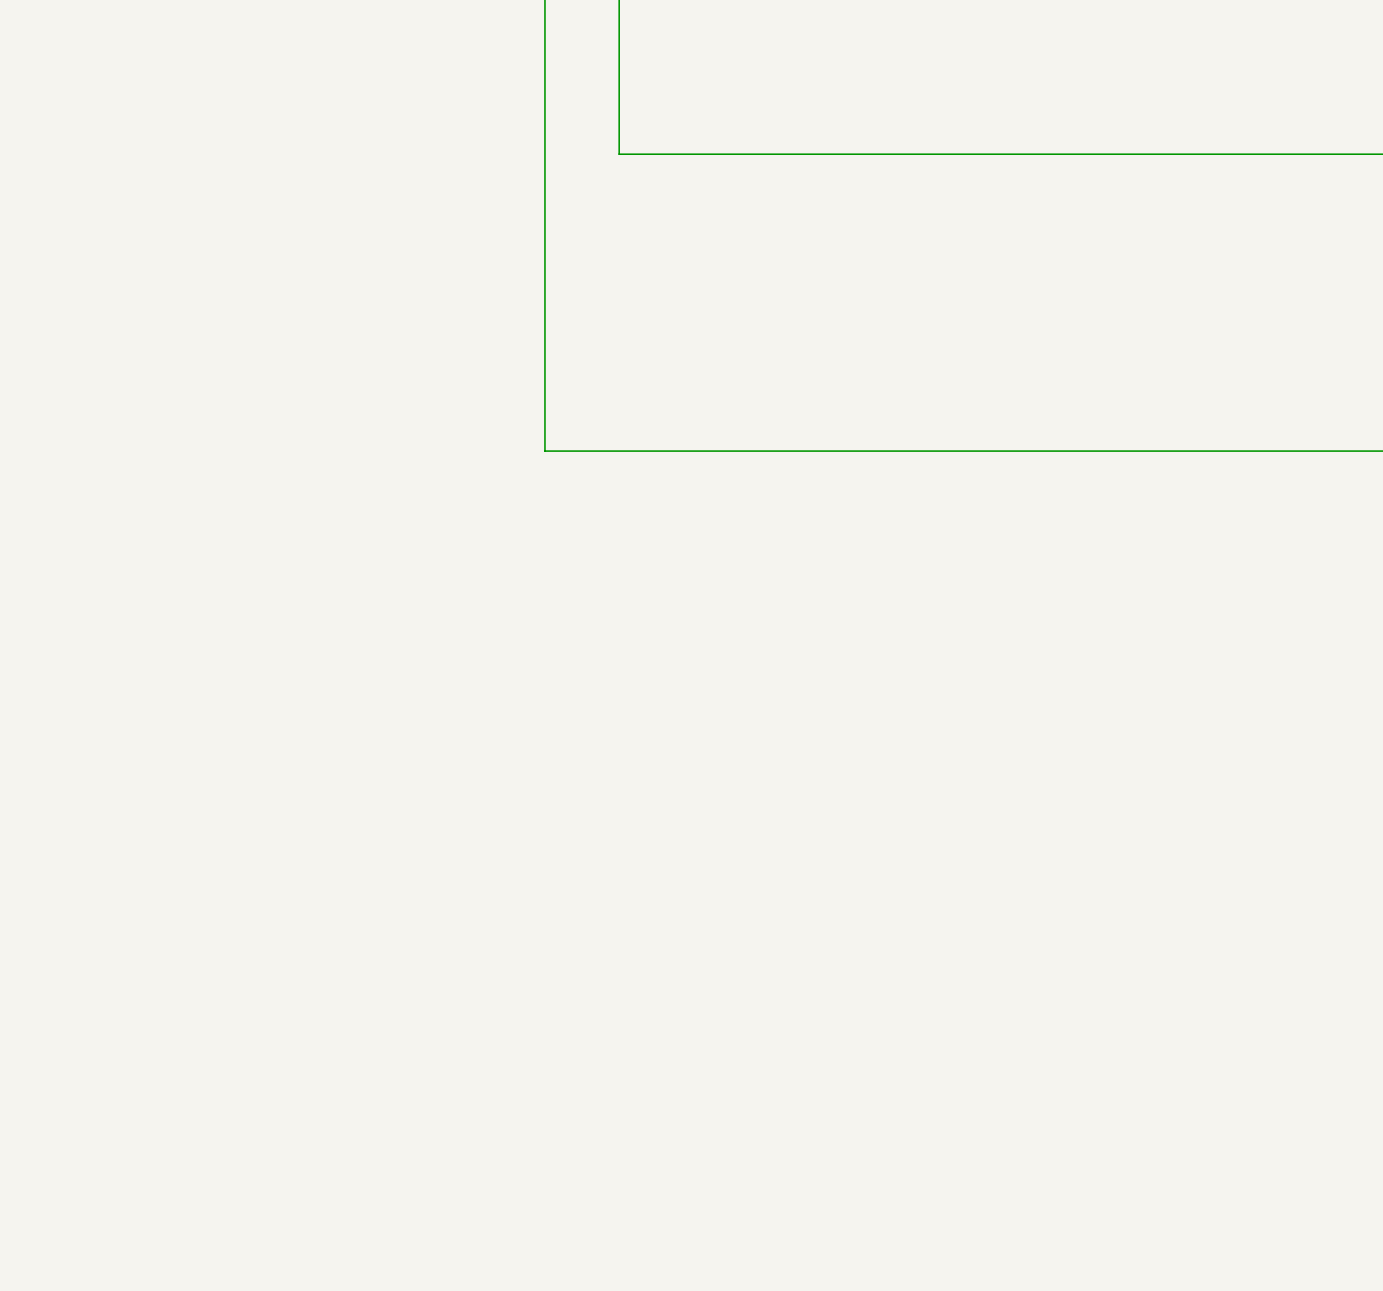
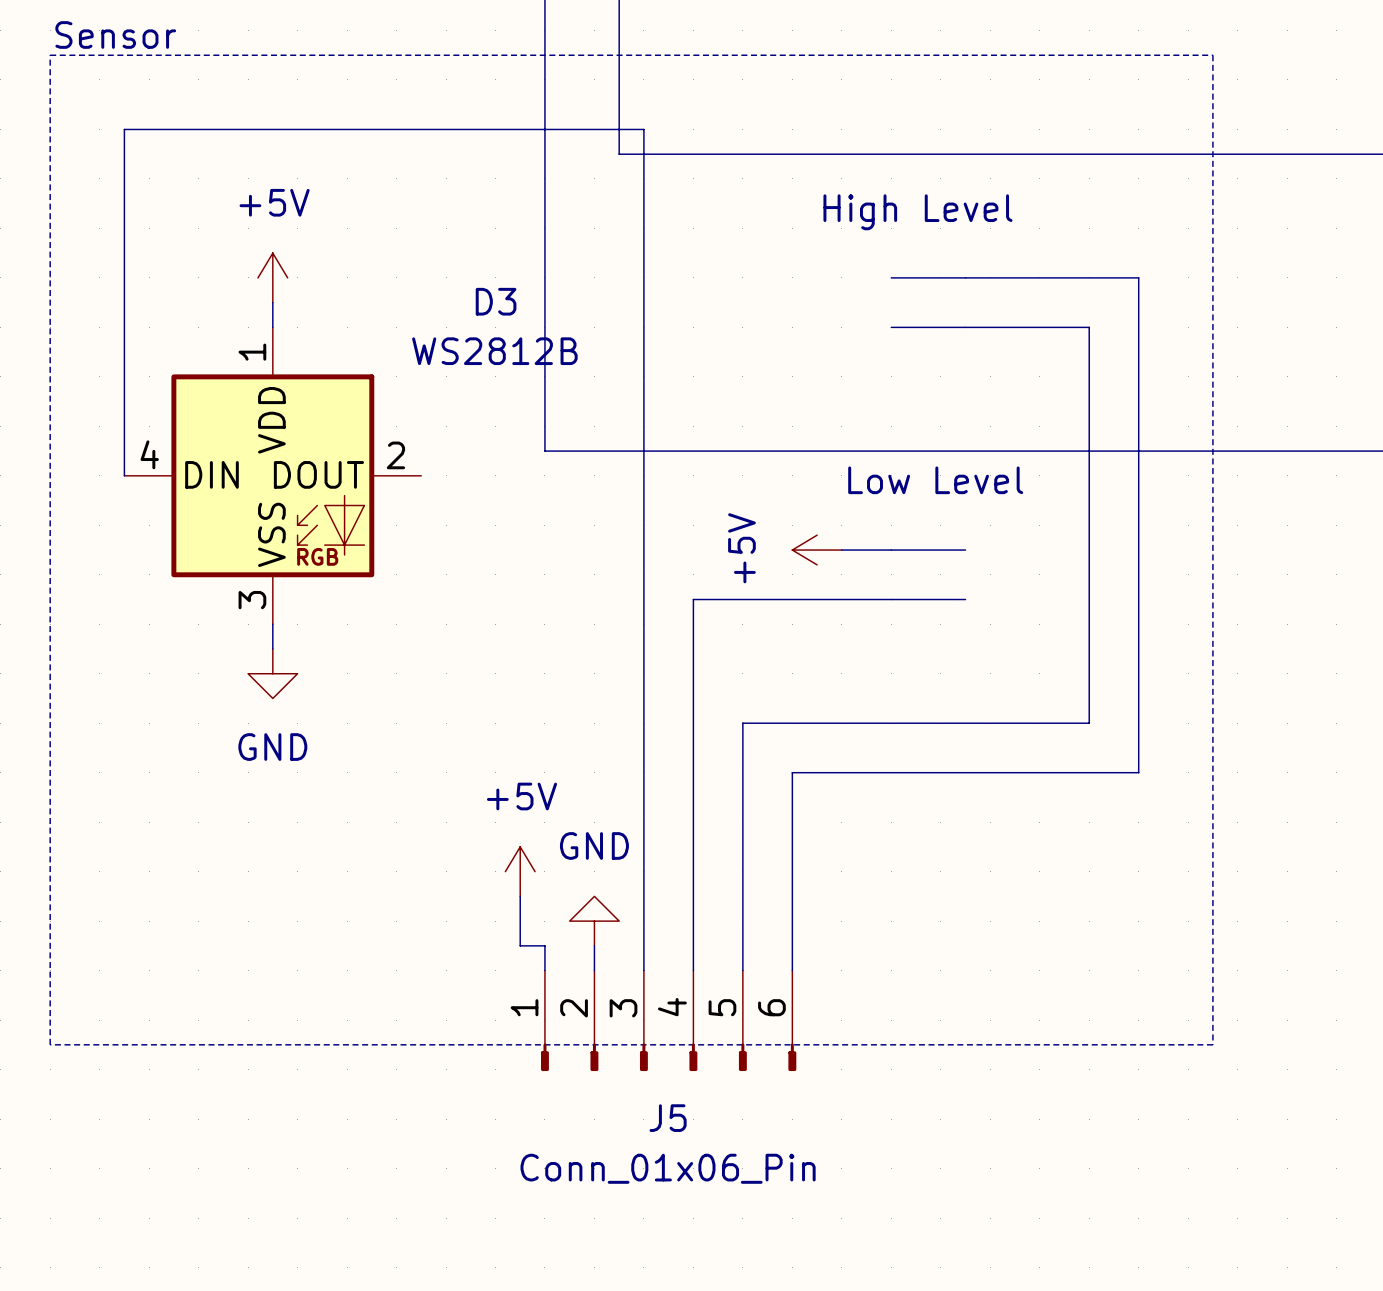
text: none -> Sensor (115, 34)
line: none -> (50, 55) (1212, 55) (1212, 1044) (50, 1044) (50, 55)
text: none -> High Level (918, 212)
power symbol: none -> +5V (272, 277)
bus: none -> (891, 277) (965, 277)
wire: none -> (965, 277) (1138, 277) (1138, 772) (792, 772) (792, 970)
wire: none -> (272, 302) (272, 327)
bus: none -> (891, 327) (965, 327)
wire: none -> (965, 327) (1089, 327) (1089, 723) (742, 723) (742, 970)
wire: none -> (124, 475) (124, 129) (643, 129) (643, 970)
D3: none -> WS2812B (272, 475)
text: none -> Low Level (935, 480)
power symbol: none -> +5V (817, 550)
wire: none -> (841, 550) (891, 550)
bus: none -> (891, 550) (965, 550)
wire: none -> (891, 599) (693, 599) (693, 970)
bus: none -> (891, 599) (965, 599)
wire: none -> (272, 624) (272, 648)
power symbol: none -> GND (272, 673)
power symbol: none -> +5V (520, 871)
wire: none -> (520, 896) (520, 945) (544, 945) (544, 970)
power symbol: none -> GND (594, 921)
wire: none -> (594, 945) (594, 970)
J5: none -> Conn_01x06_Pin (668, 1020)

